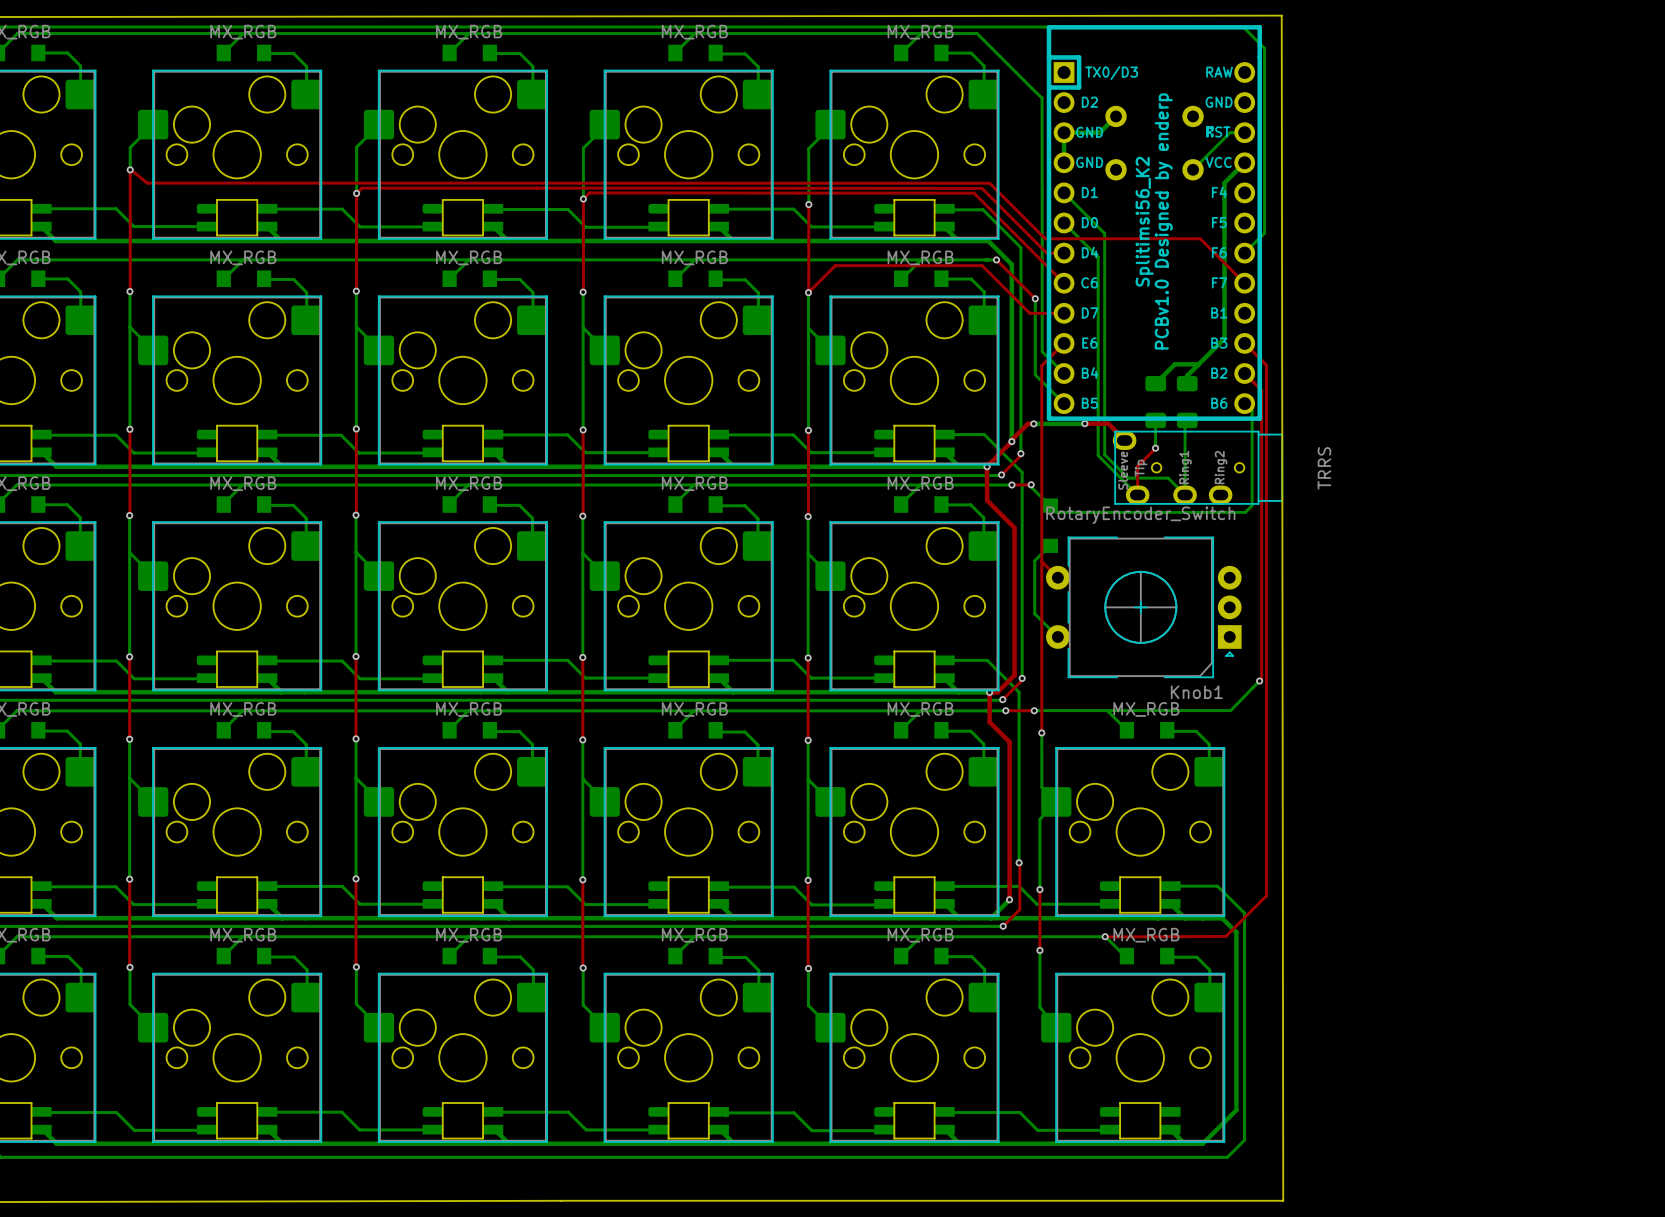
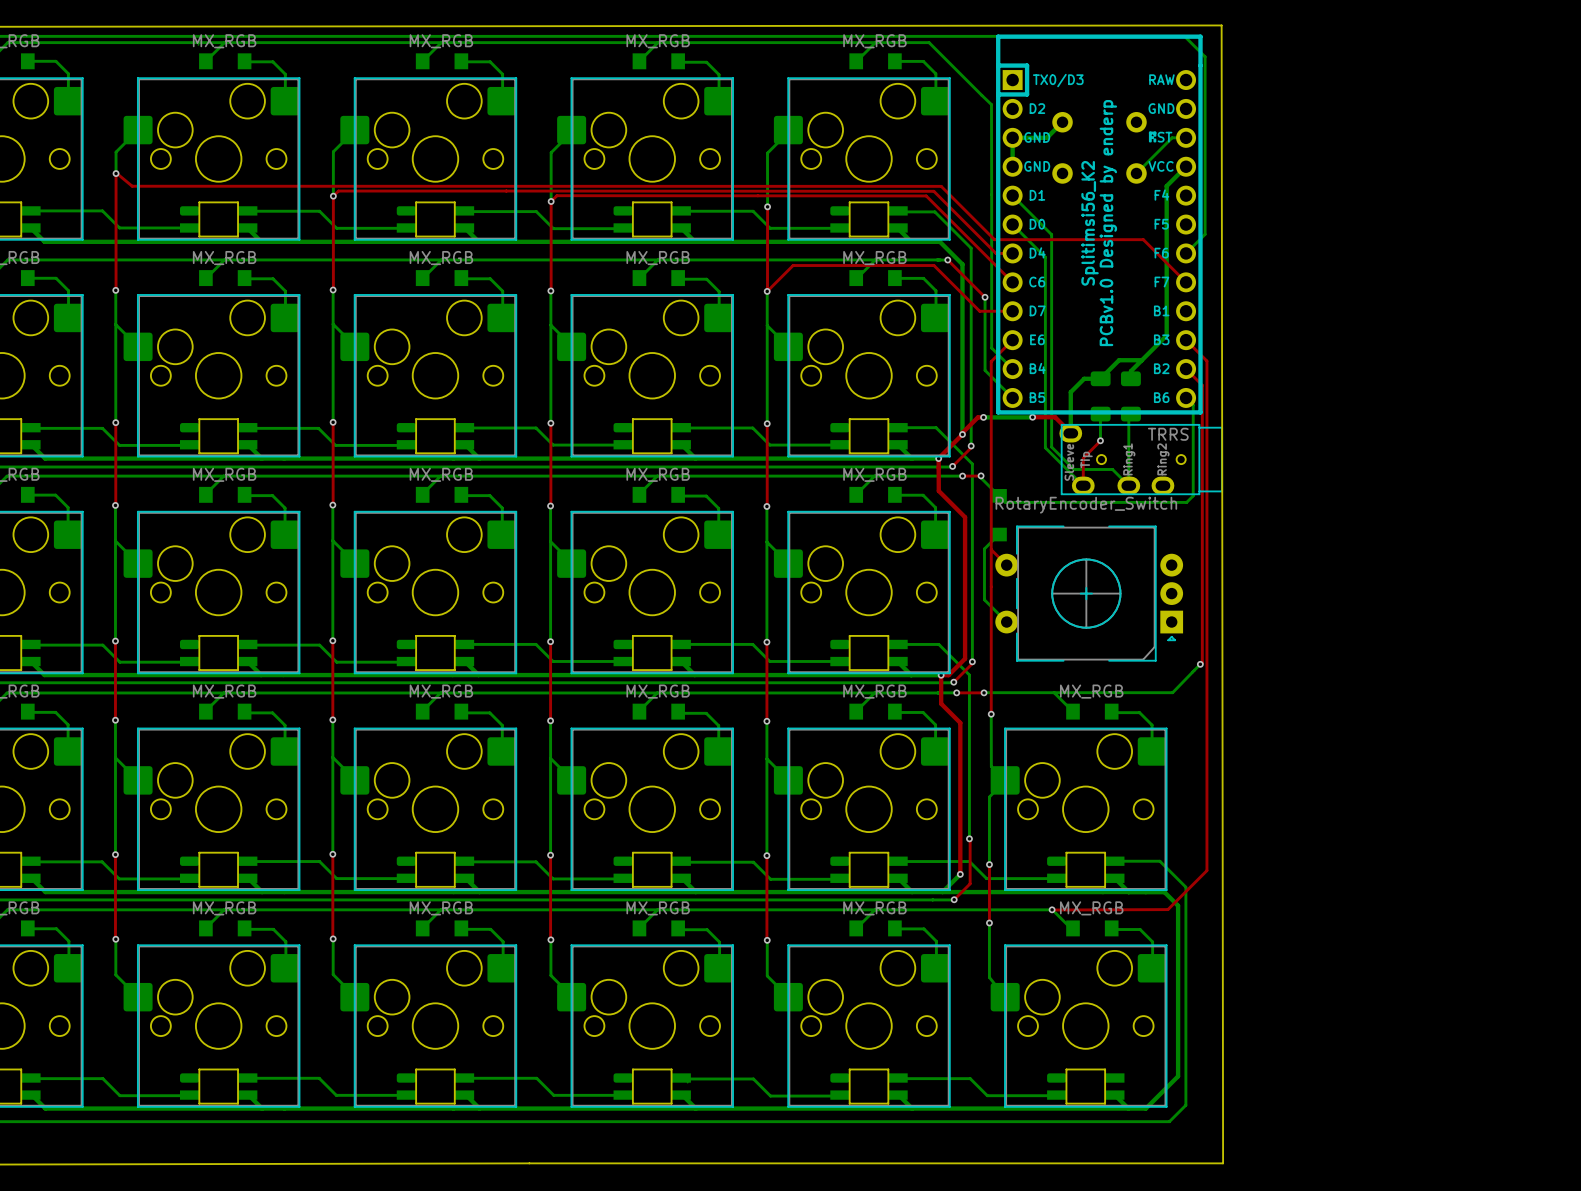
bottom track: none -> (1100, 378) (1084, 378) (1070, 392) (1070, 433)
part value rotation: 0° (1324, 468) -> 90° clockwise (1168, 434)
part value position: TRRS (1324, 468) -> TRRS (1168, 434)
Knob1 name: Knob1 (1196, 692) -> none

